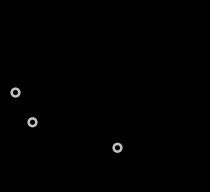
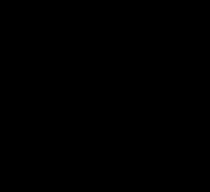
via: (15, 92) -> none
via: (32, 122) -> none
via: (117, 147) -> none

